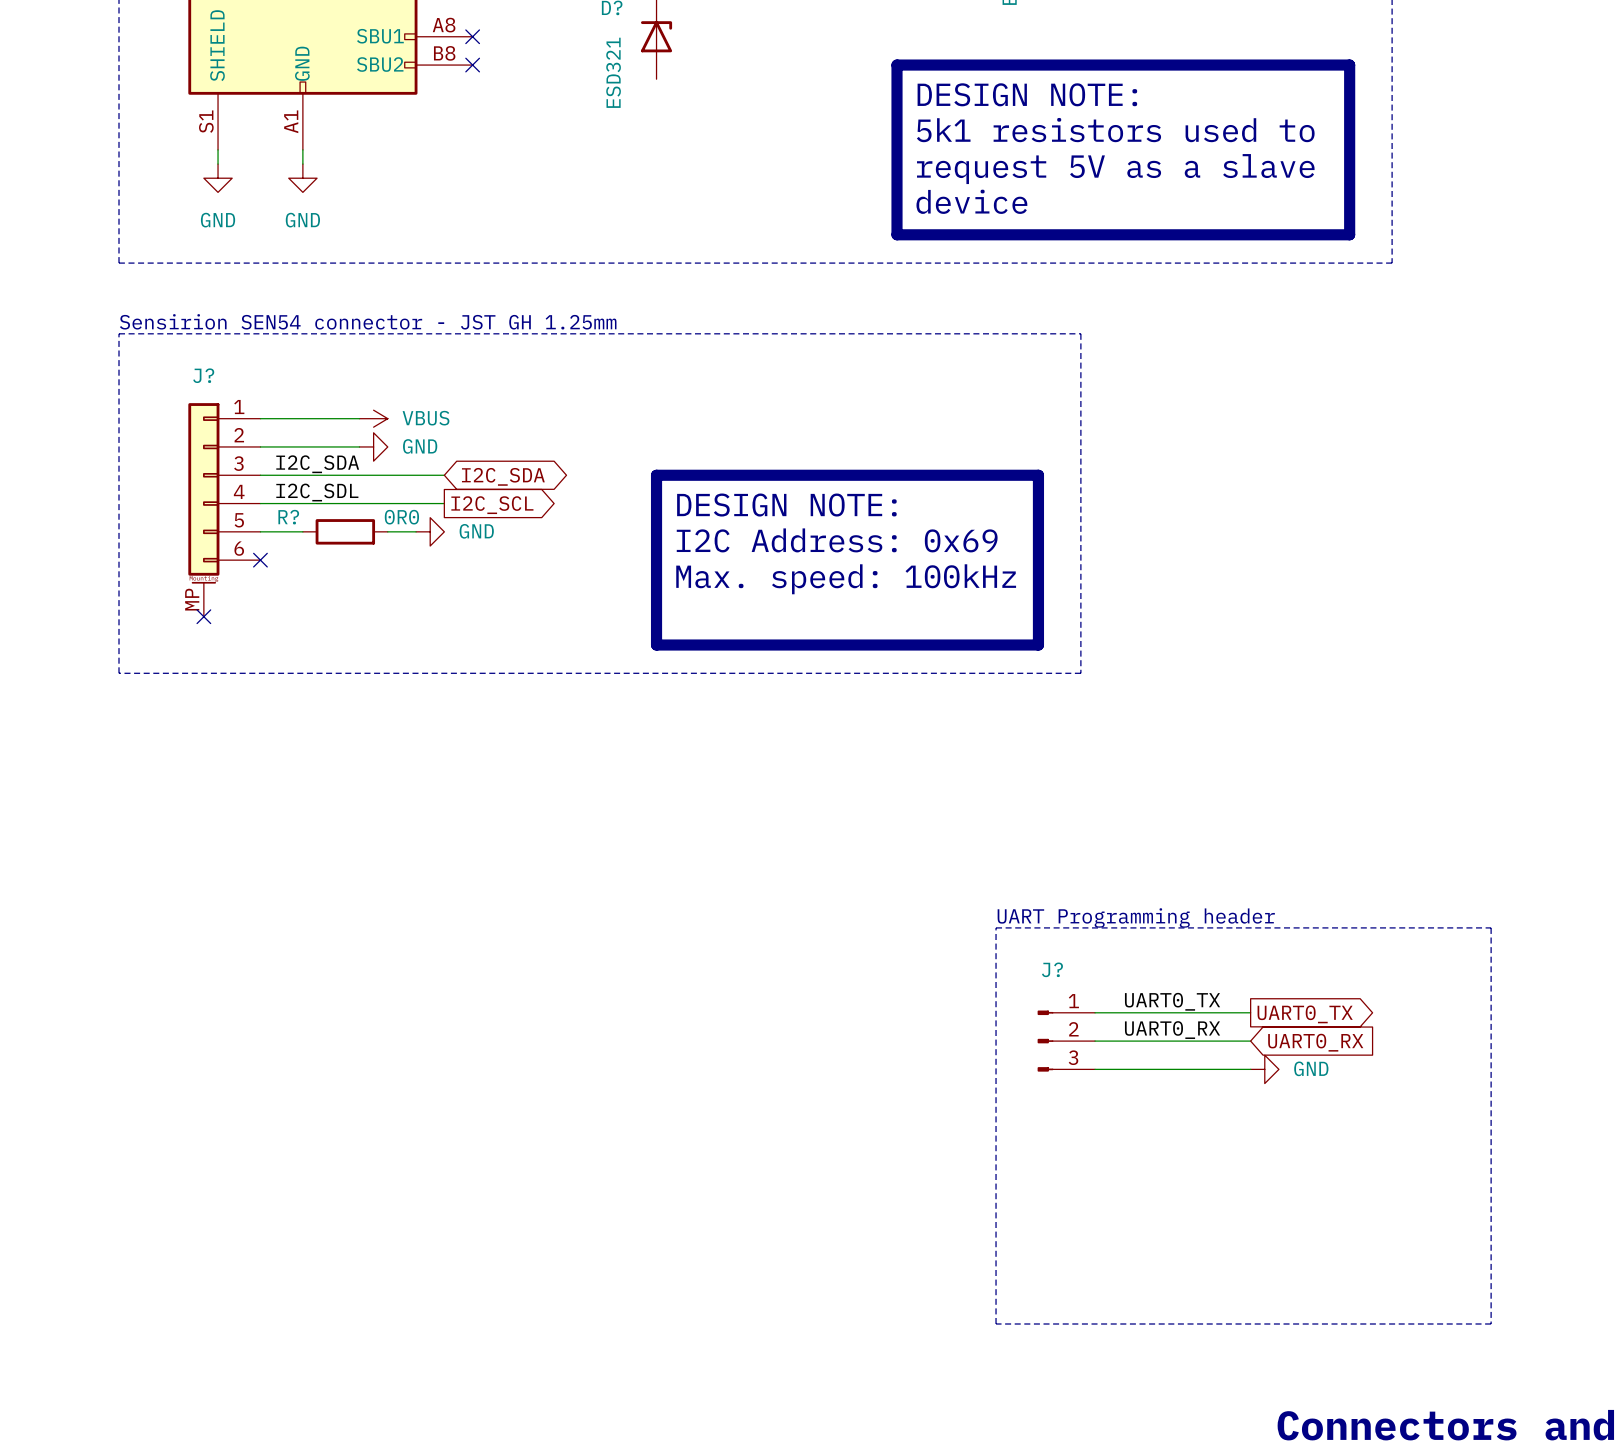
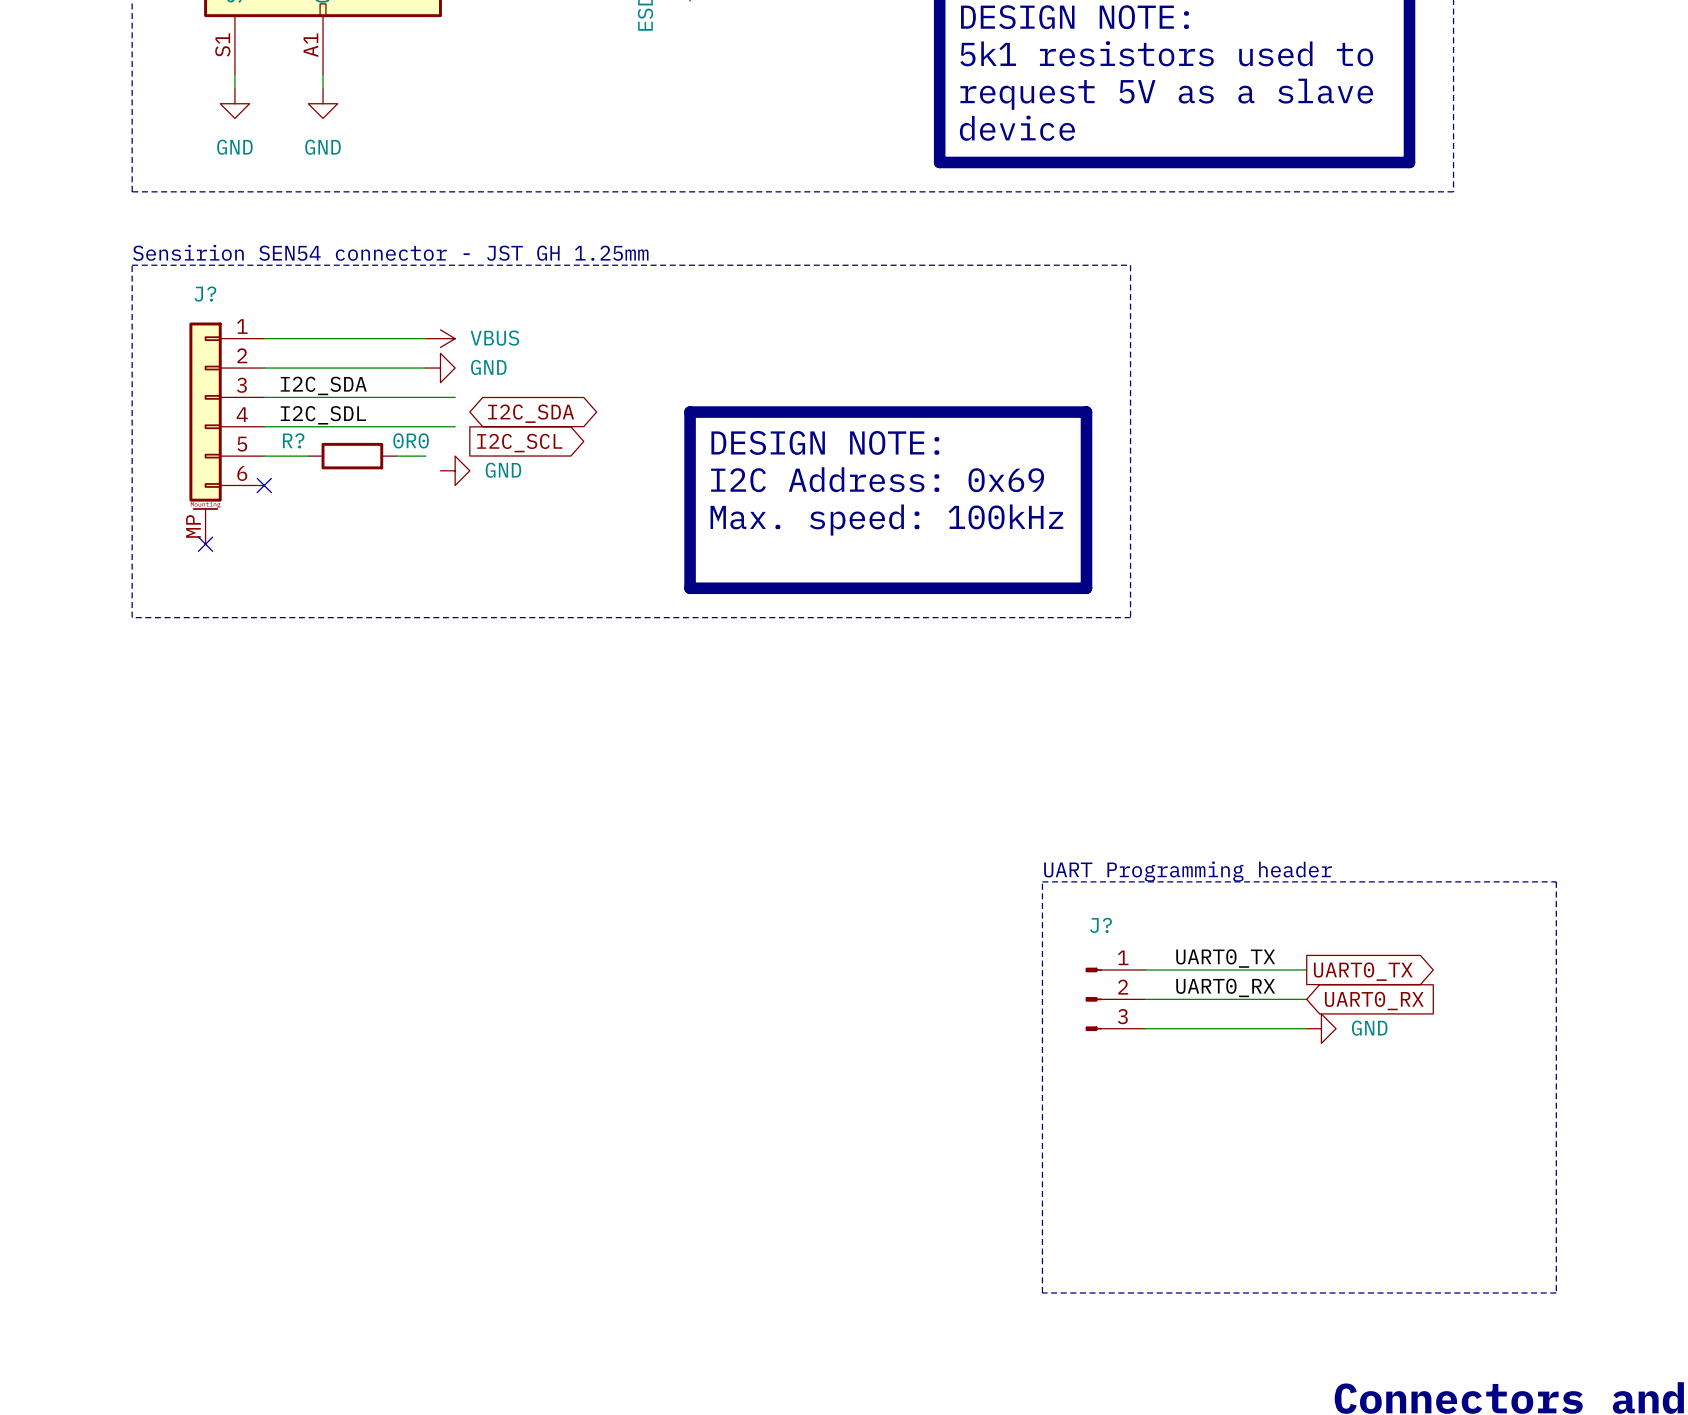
wire: none -> (264, 338) (425, 338)
wire: (260, 418) (359, 418) -> none
power symbol position: VBUS (373, 418) -> VBUS (440, 338)
wire: none -> (264, 368) (425, 368)
wire: (260, 446) (359, 446) -> none
power symbol position: GND (373, 446) -> GND (440, 368)
label position: I2C_SDA (317, 464) -> I2C_SDA (323, 385)
wire: (260, 475) (444, 475) -> (264, 397) (455, 397)
label position: I2C_SDL (317, 492) -> I2C_SDL (323, 415)
wire: (260, 503) (444, 503) -> (264, 426) (455, 426)
J? position: (224, 509) -> (226, 433)
wire: (260, 531) (302, 531) -> (264, 456) (308, 456)
R? position: (345, 531) -> (352, 456)
wire: (387, 531) (416, 531) -> (396, 456) (425, 456)
no-connect mark position: (260, 560) -> (264, 485)
no-connect mark position: (203, 616) -> (205, 544)

